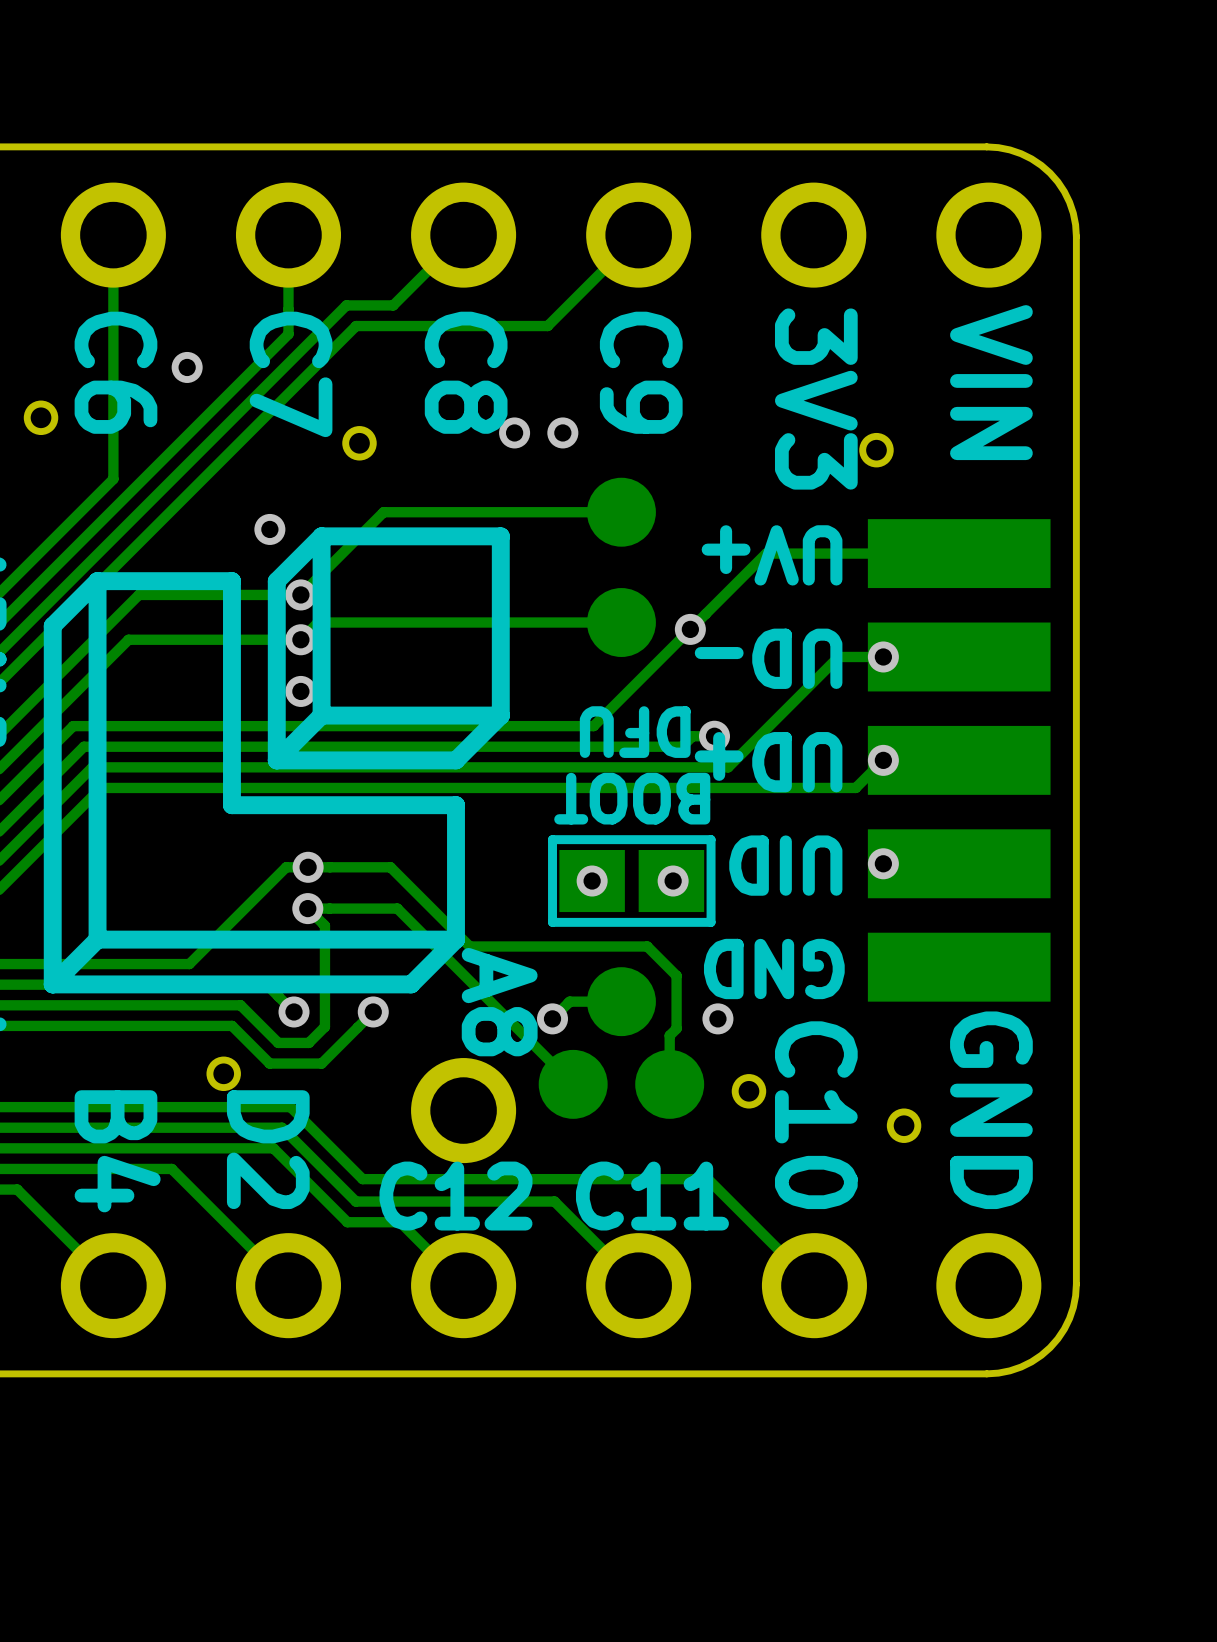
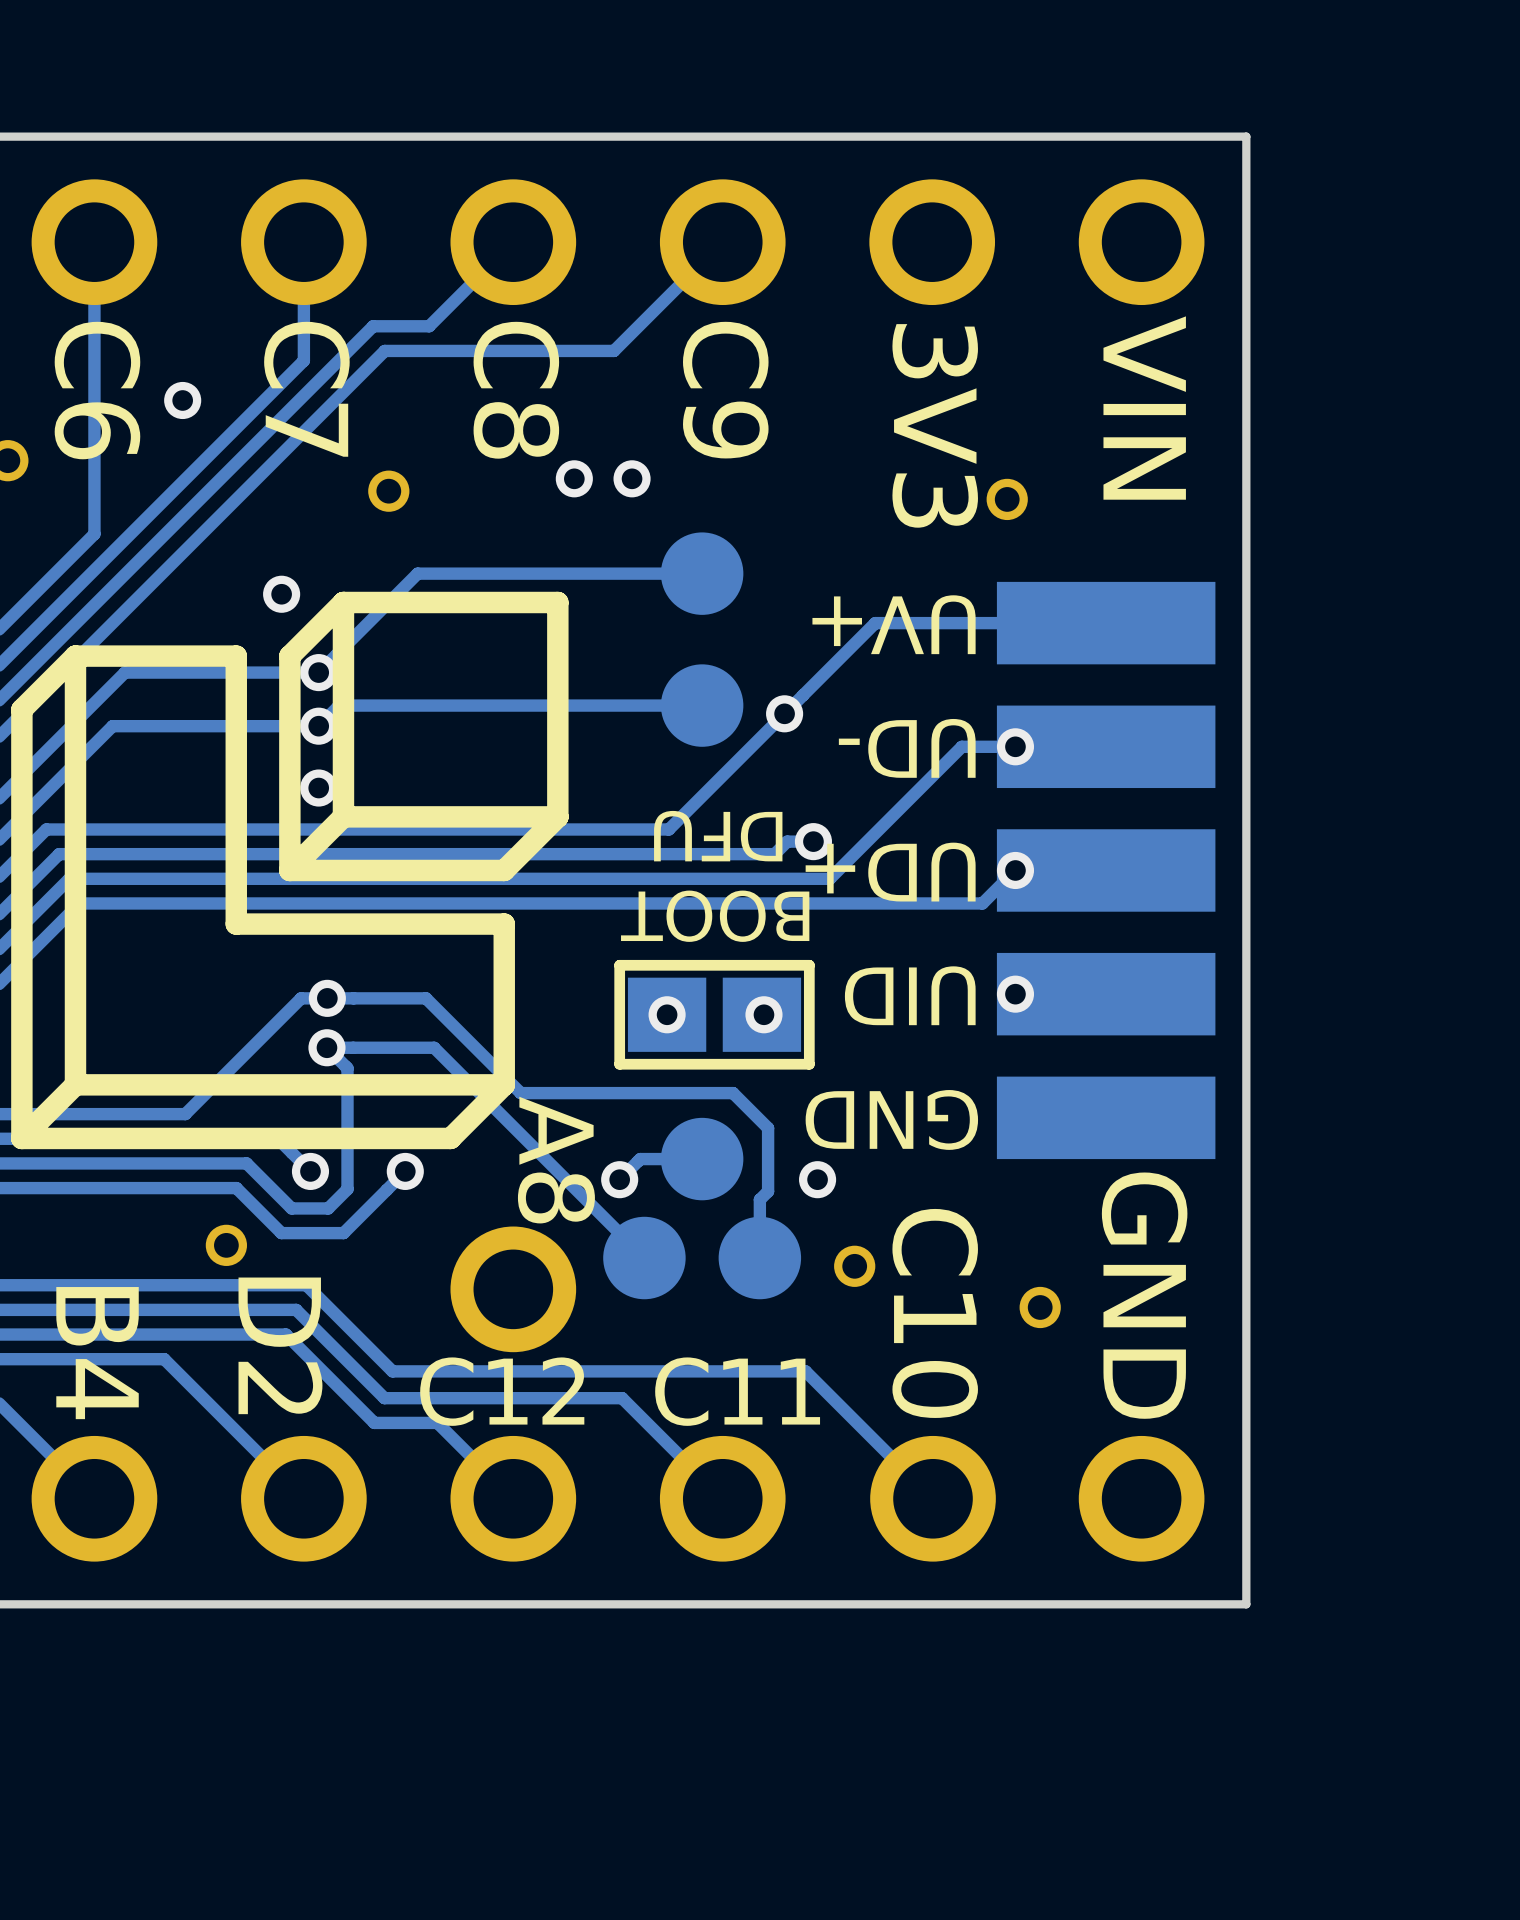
board edge: (986, 146) (998, 147) (1021, 153) (1031, 158) (1050, 173) (1064, 191) (1069, 202) (1075, 224) (1076, 236) -> (1139, 136) (1246, 136) (1246, 243)
board edge: (1076, 1284) (1075, 1295) (1069, 1318) (1064, 1329) (1050, 1347) (1041, 1355) (1021, 1367) (998, 1373) (986, 1373) -> (1246, 1497) (1246, 1604) (1139, 1604)

